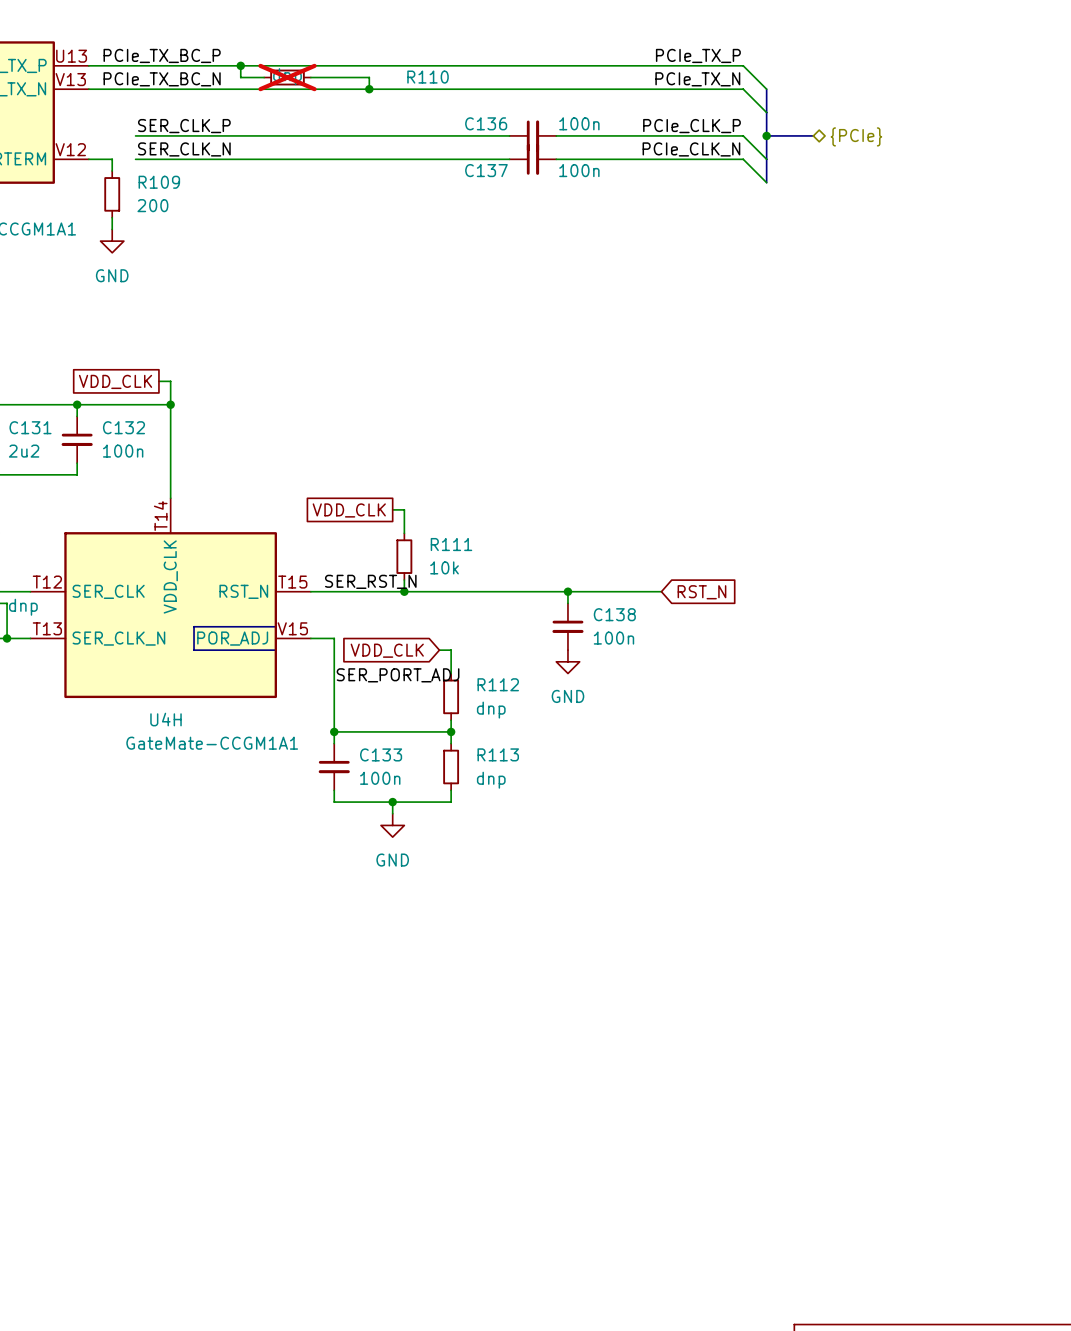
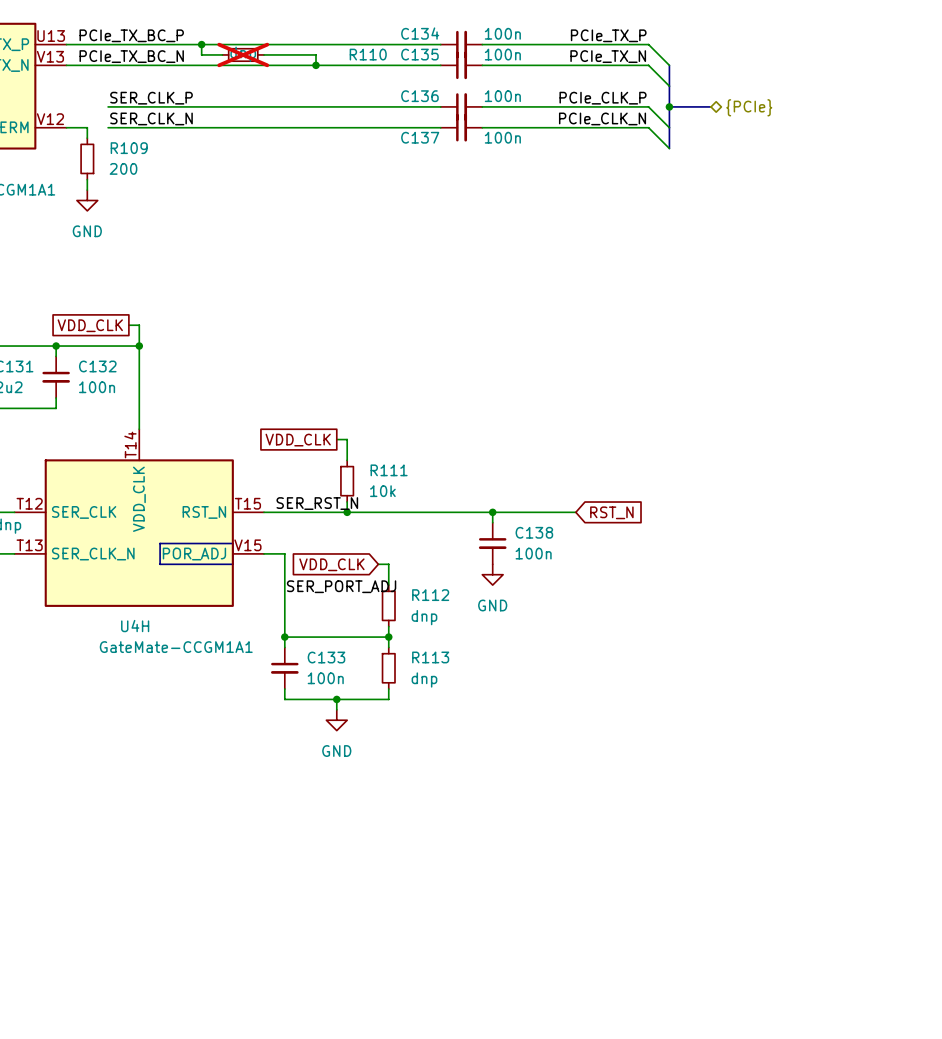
C134: none -> 100n (461, 44)
C135: none -> 100n (461, 65)

